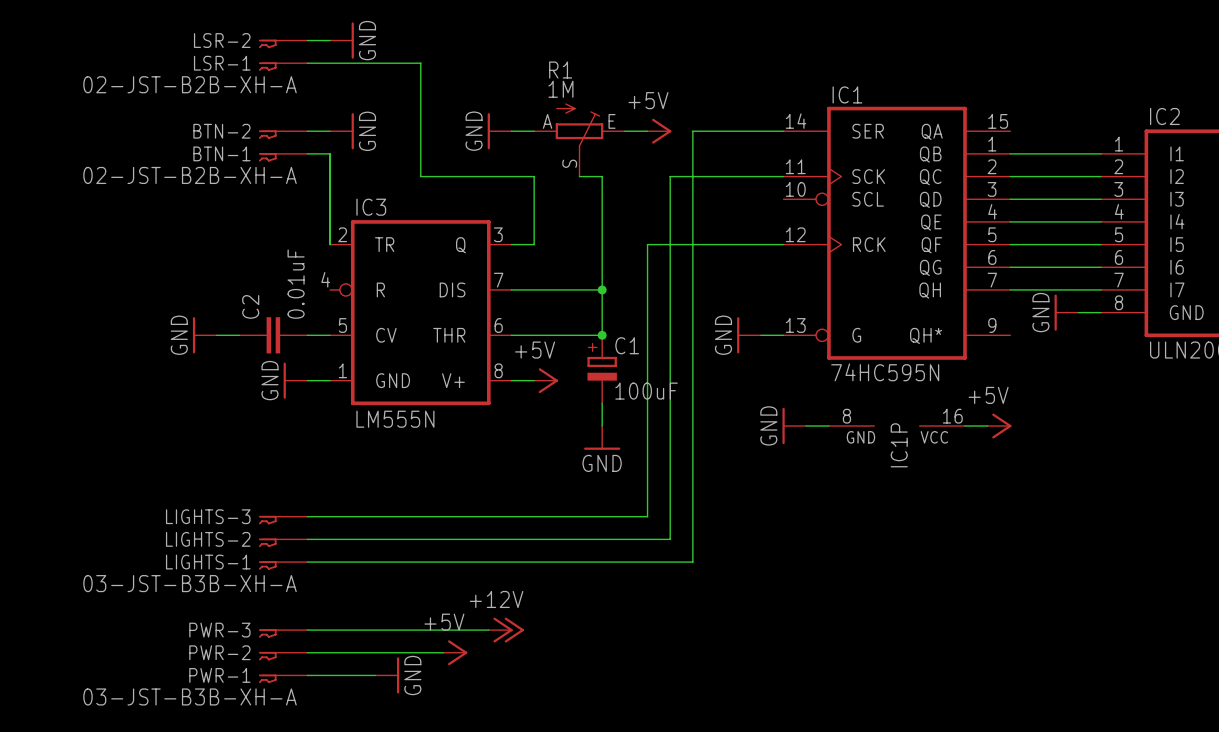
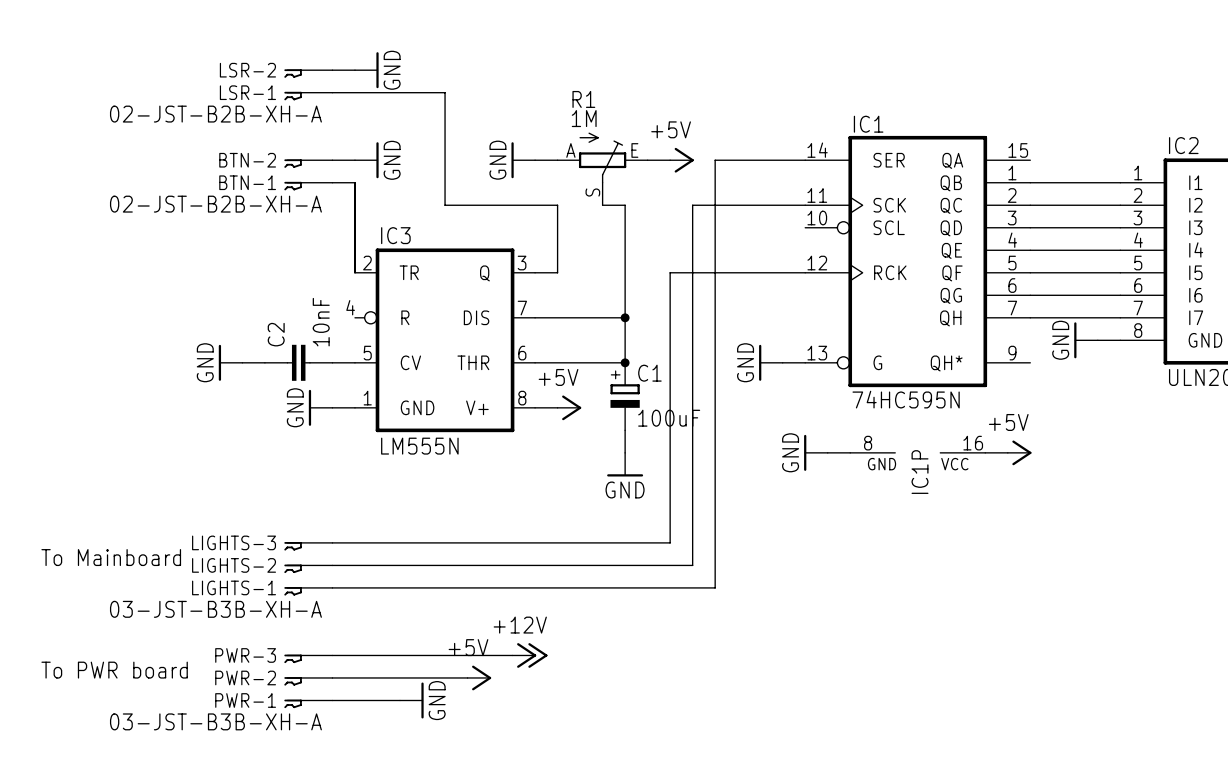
C2 value: 0.01uF (296, 284) -> 10nF (321, 322)
text: none -> To Mainboard (111, 557)
text: none -> To PWR board (114, 670)

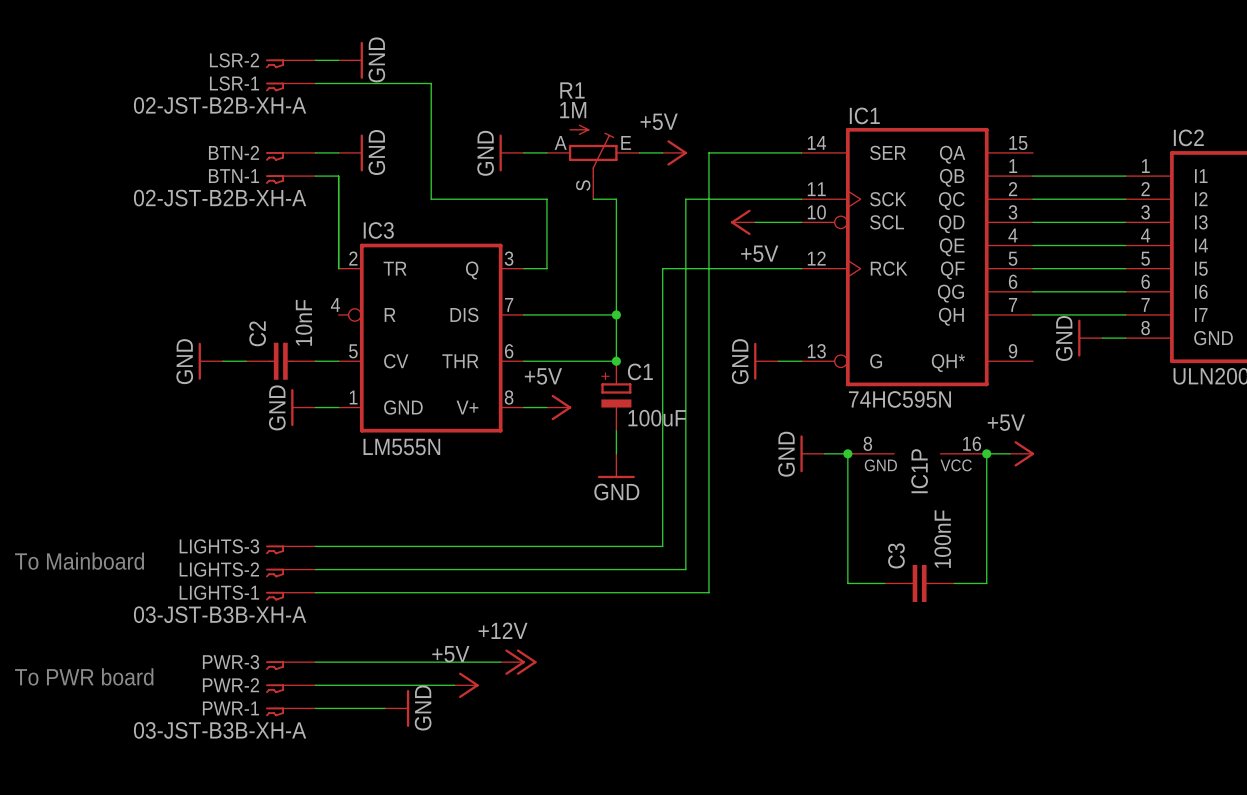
power symbol: none -> +5V (743, 222)
wire: none -> (755, 222) (801, 222)
wire: none -> (847, 453) (847, 583) (884, 583)
junction: none -> (847, 453)
wire: none -> (986, 453) (986, 583) (954, 583)
junction: none -> (986, 453)
C3: none -> 100nF (919, 583)

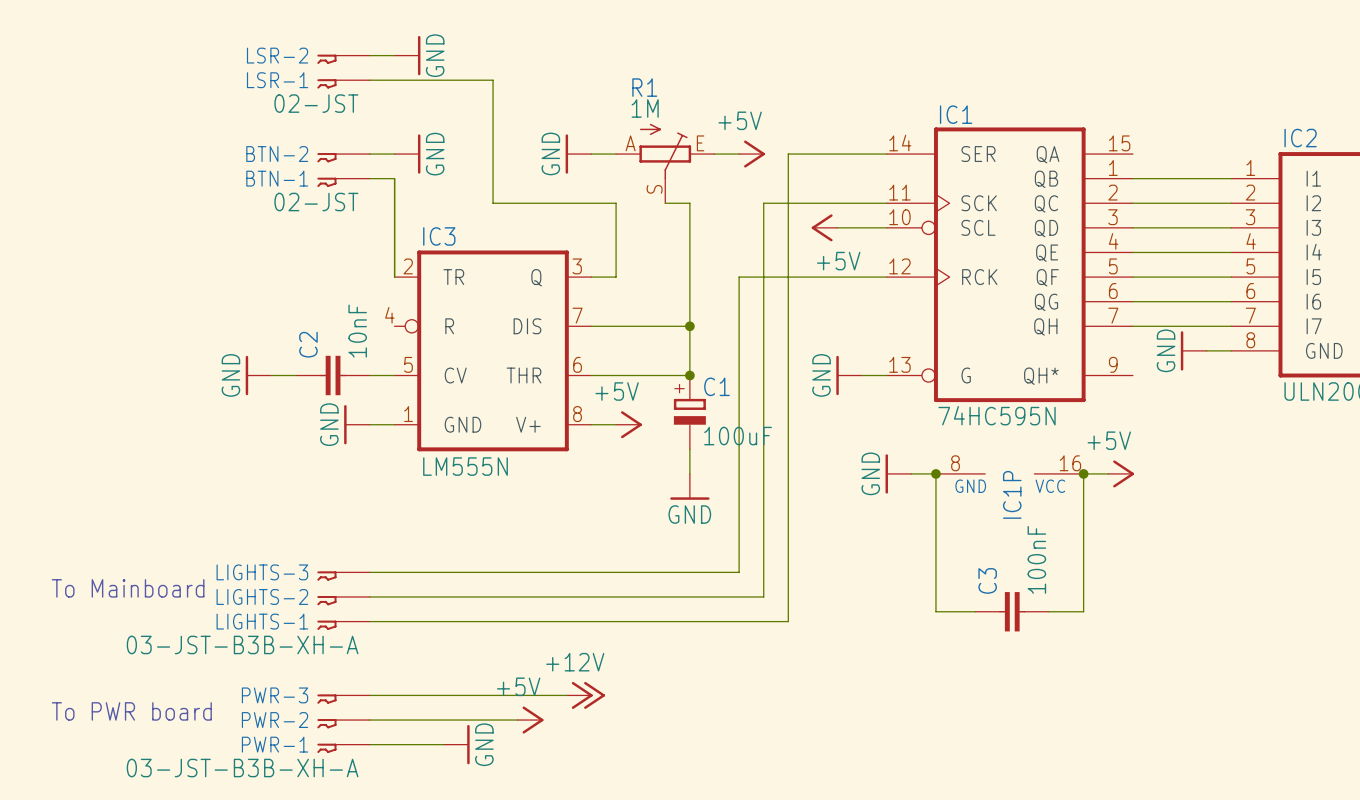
LSR-1 value: 02-JST-B2B-XH-A (220, 105) -> 02-JST (316, 103)
BTN-1 value: 02-JST-B2B-XH-A (220, 198) -> 02-JST (316, 202)

